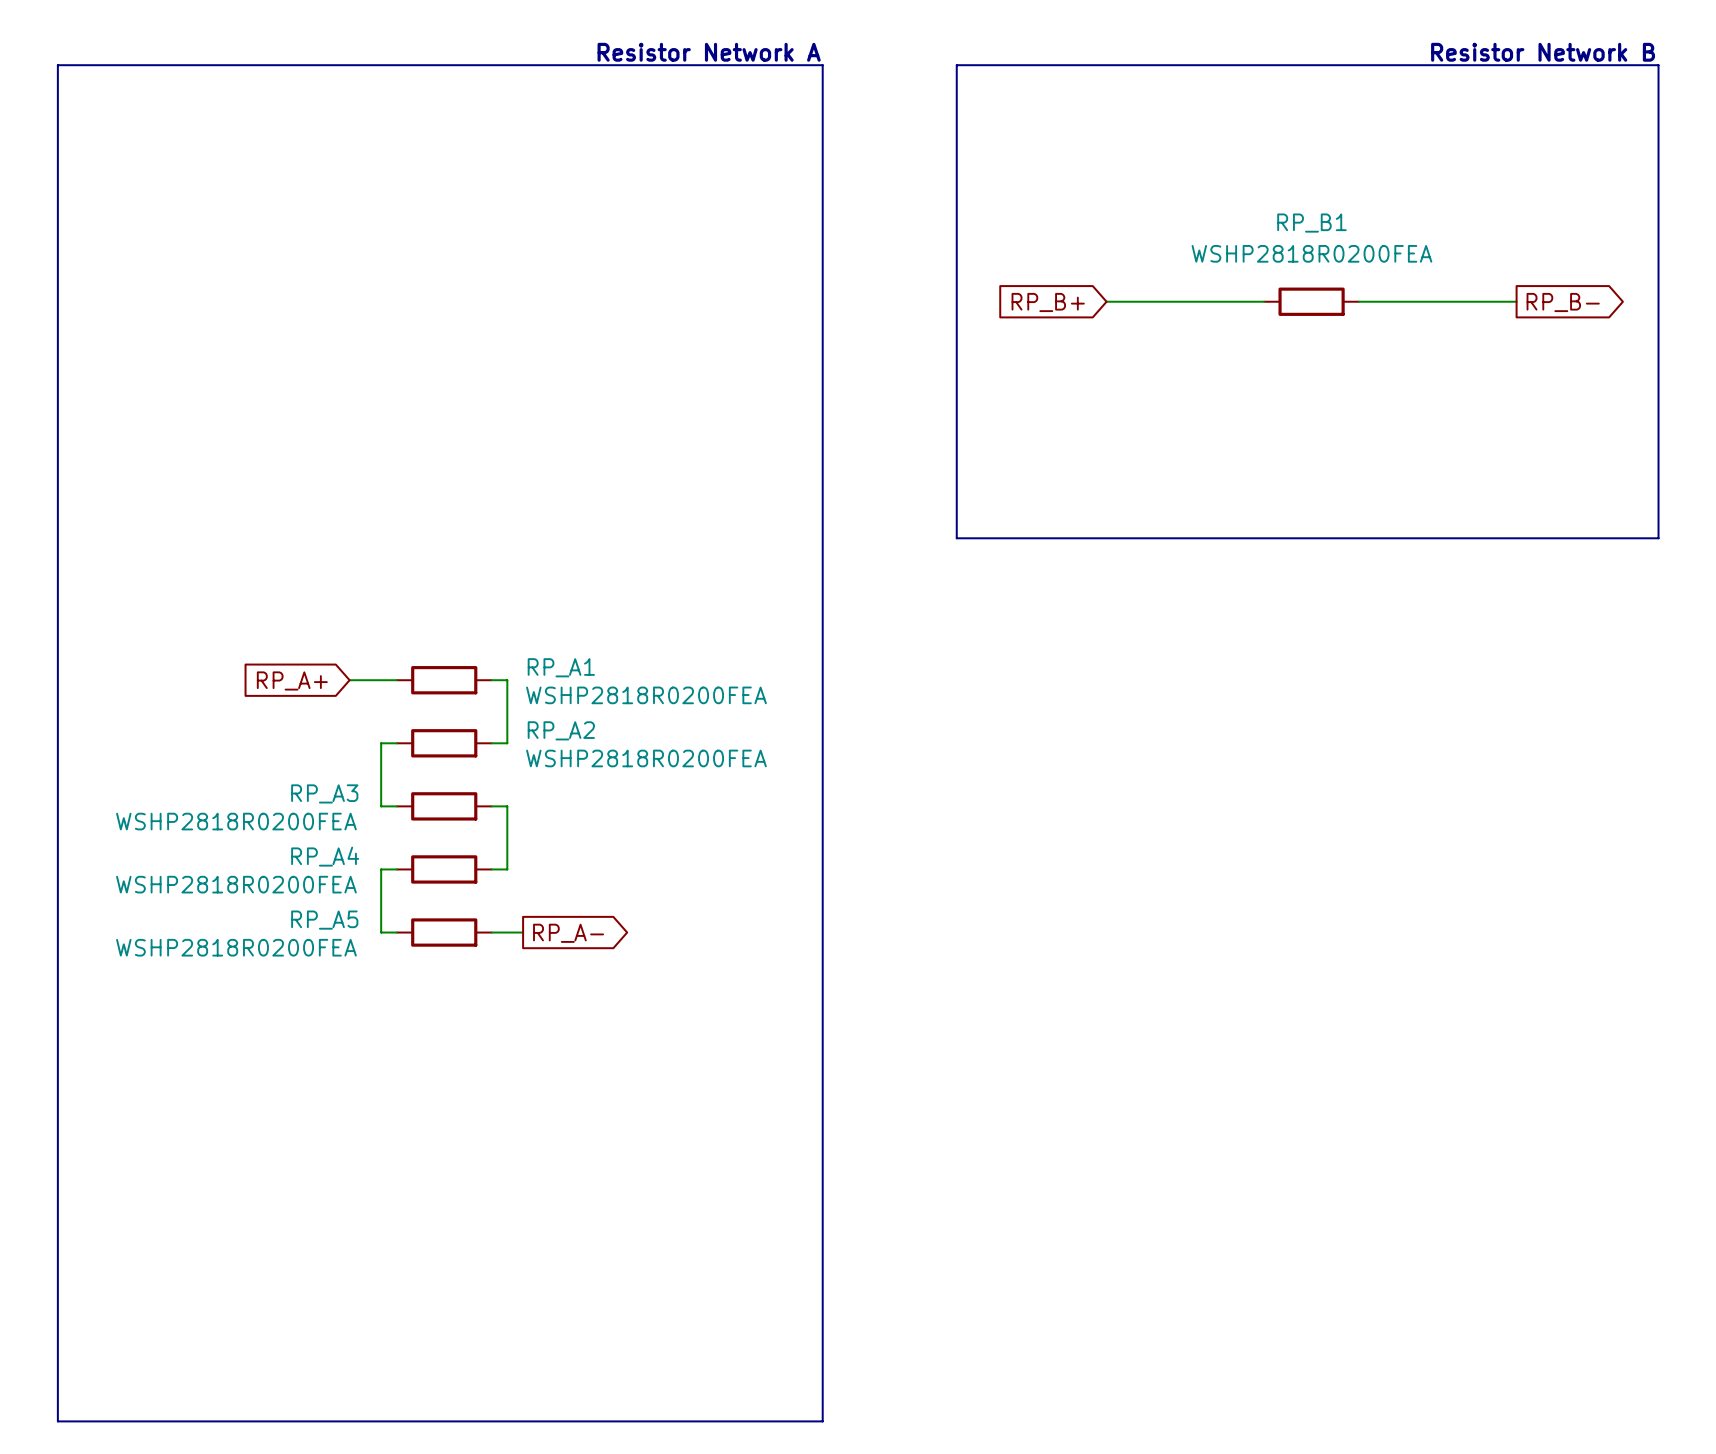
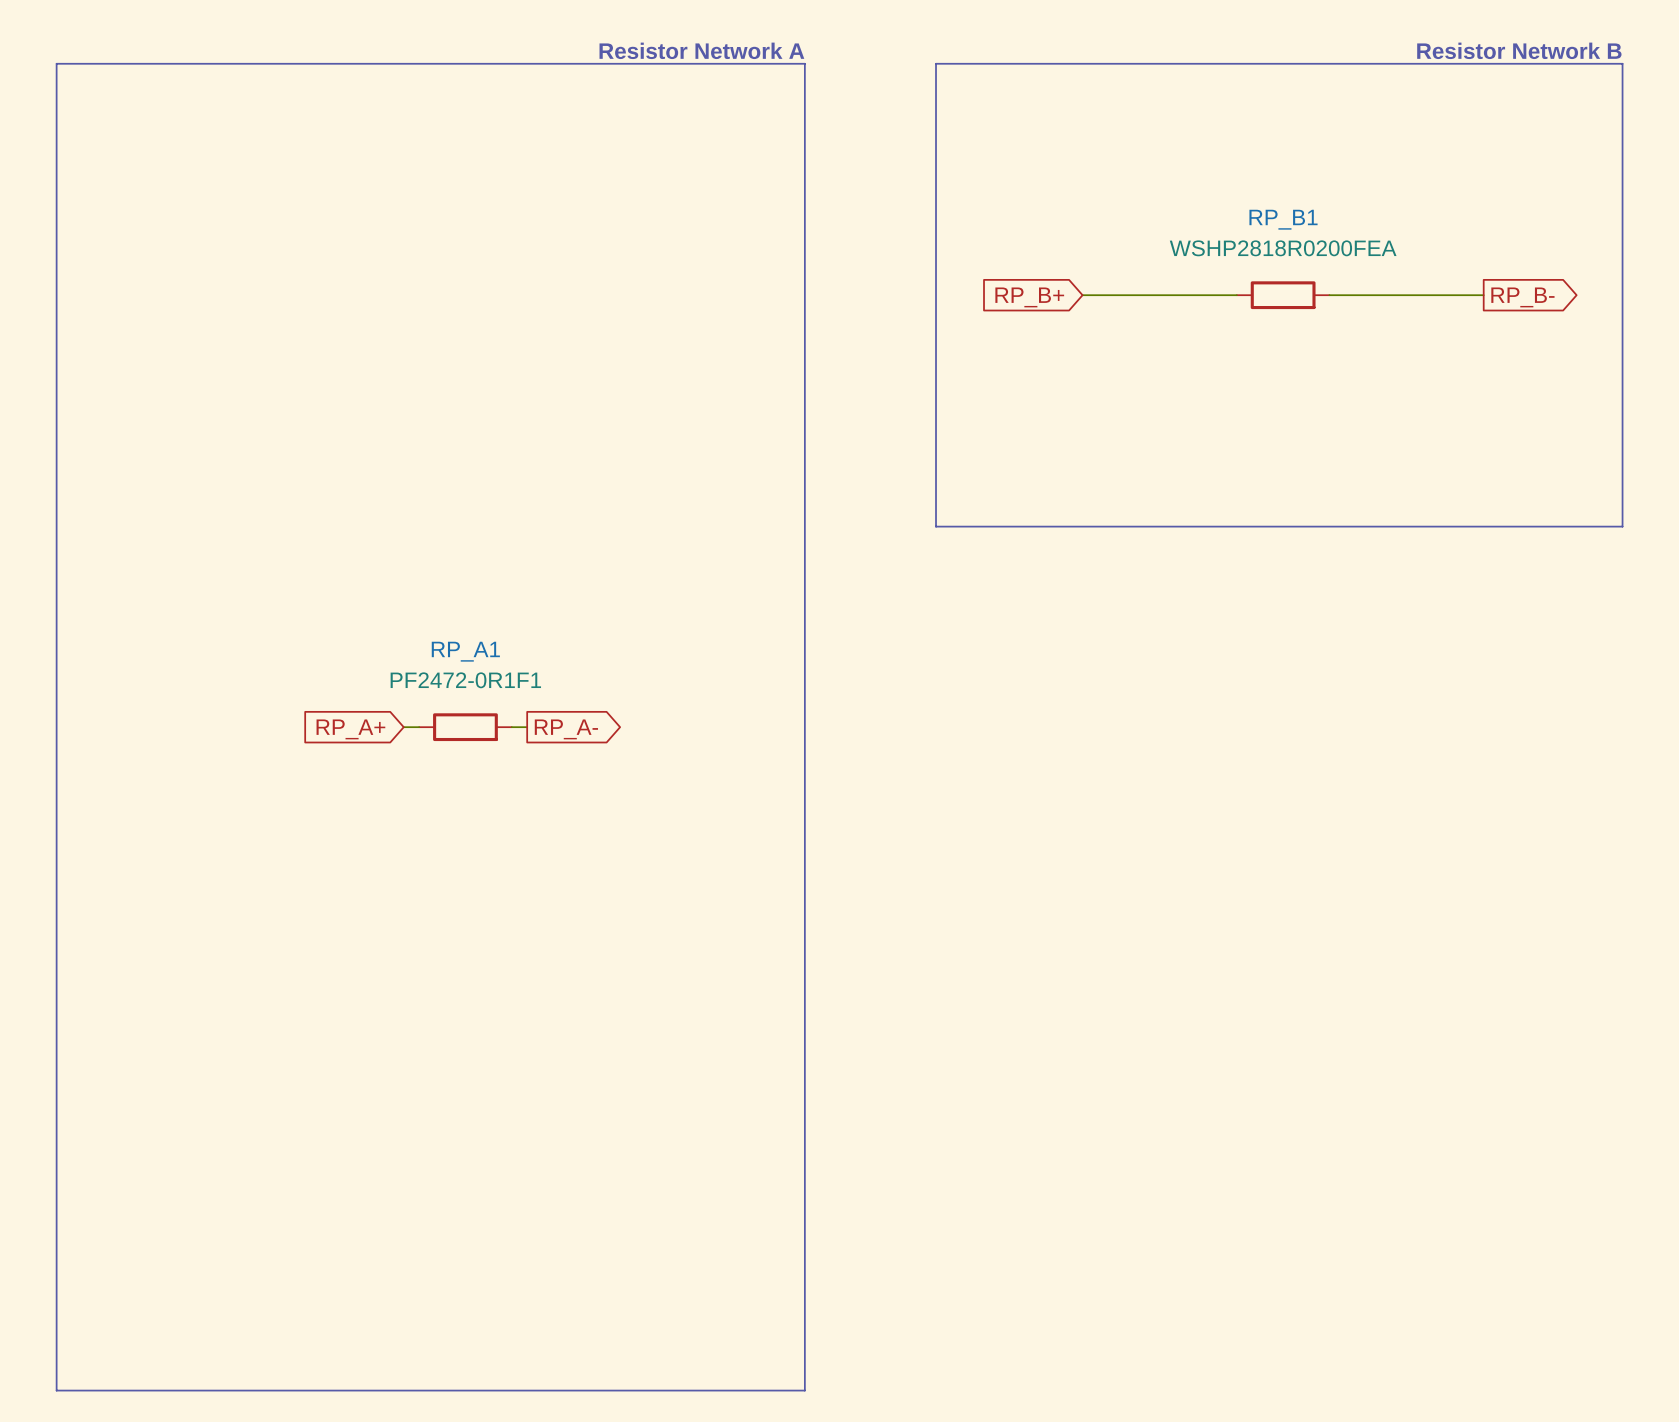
RP_A1 name position: RP_A1 (561, 667) -> RP_A1 (465, 651)
global label position: RP_A+ (292, 680) -> RP_A+ (350, 729)
wire: (349, 680) (396, 680) -> none
RP_A1 position: (444, 680) -> (465, 727)
wire: (491, 680) (507, 680) (507, 743) (491, 743) -> none
RP_A1 value: WSHP2818R0200FEA (646, 695) -> PF2472-0R1F1 (465, 680)
wire: (396, 743) (381, 743) (381, 806) (396, 806) -> none
wire: none -> (403, 727) (419, 727)
RP_A2: WSHP2818R0200FEA (444, 743) -> none
wire: none -> (511, 727) (527, 727)
RP_A3: WSHP2818R0200FEA (444, 806) -> none
wire: (491, 806) (507, 806) (507, 869) (491, 869) -> none
wire: (396, 869) (381, 869) (381, 932) (396, 932) -> none
RP_A4: WSHP2818R0200FEA (444, 869) -> none
RP_A5: WSHP2818R0200FEA (444, 932) -> none
wire: (491, 932) (523, 932) -> none
global label position: RP_A- (568, 933) -> RP_A- (566, 729)

